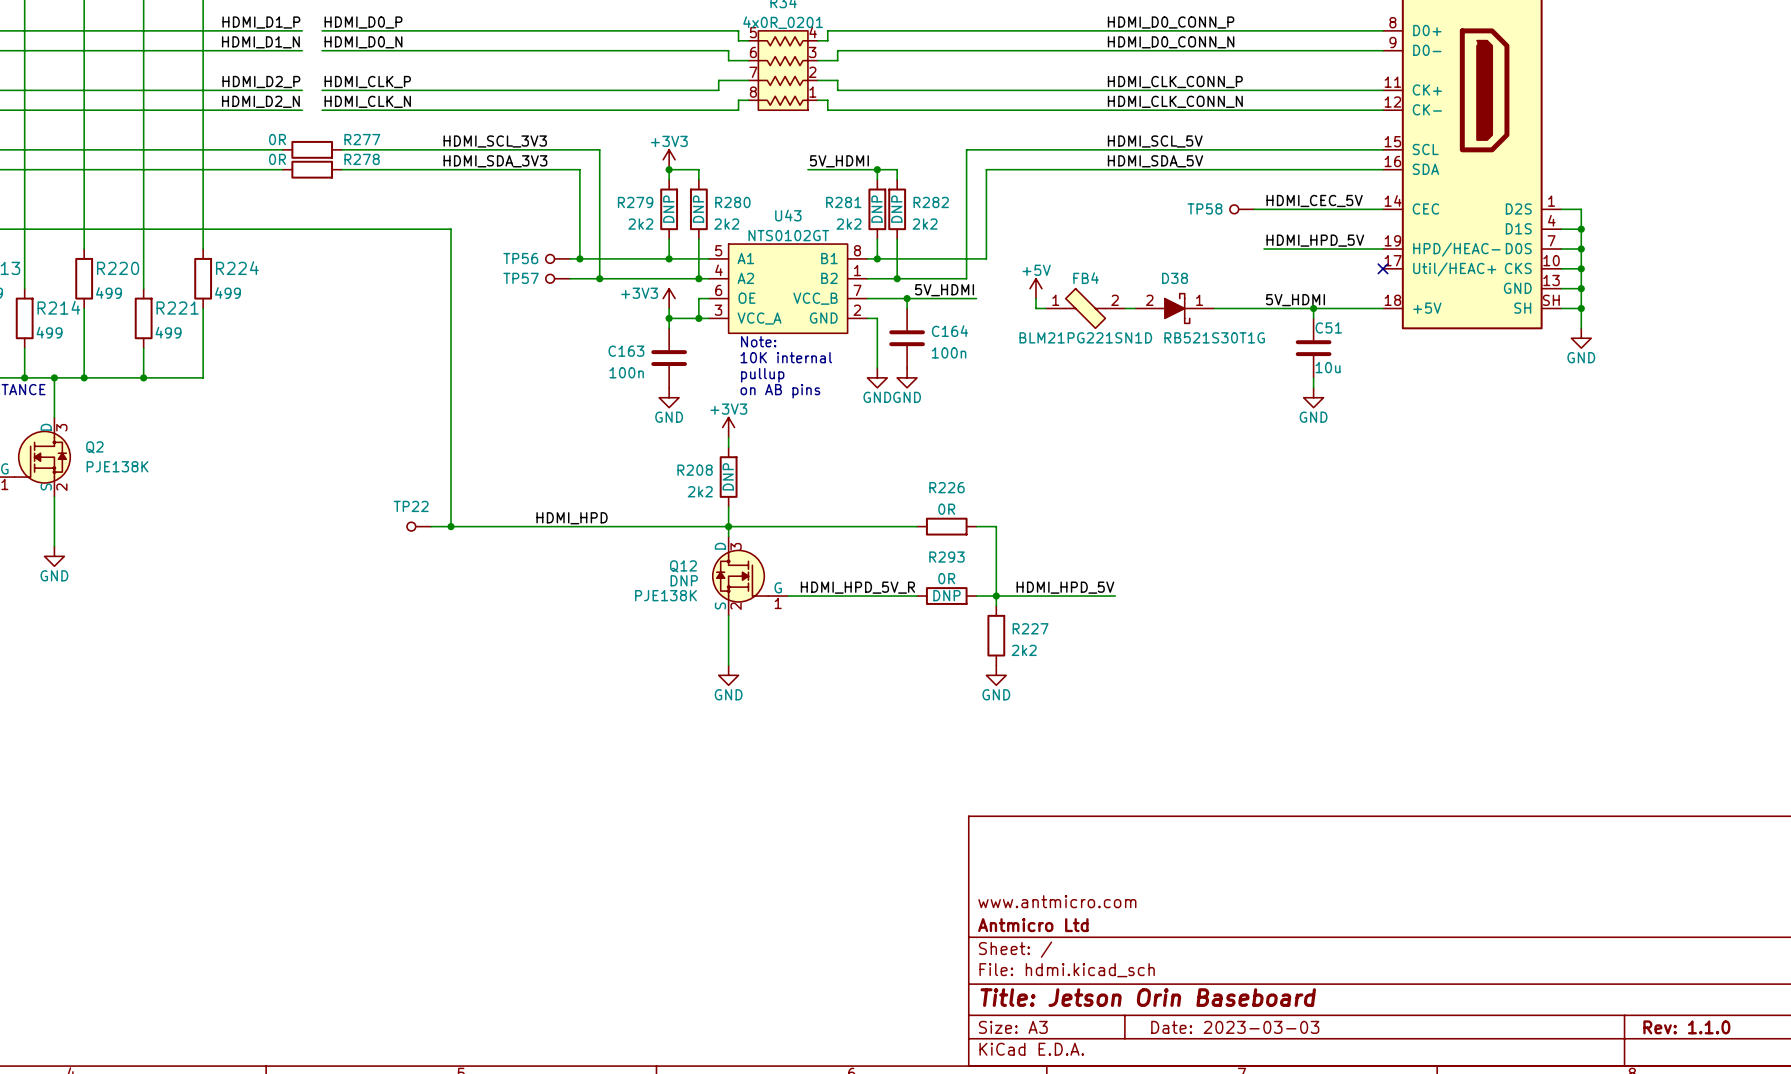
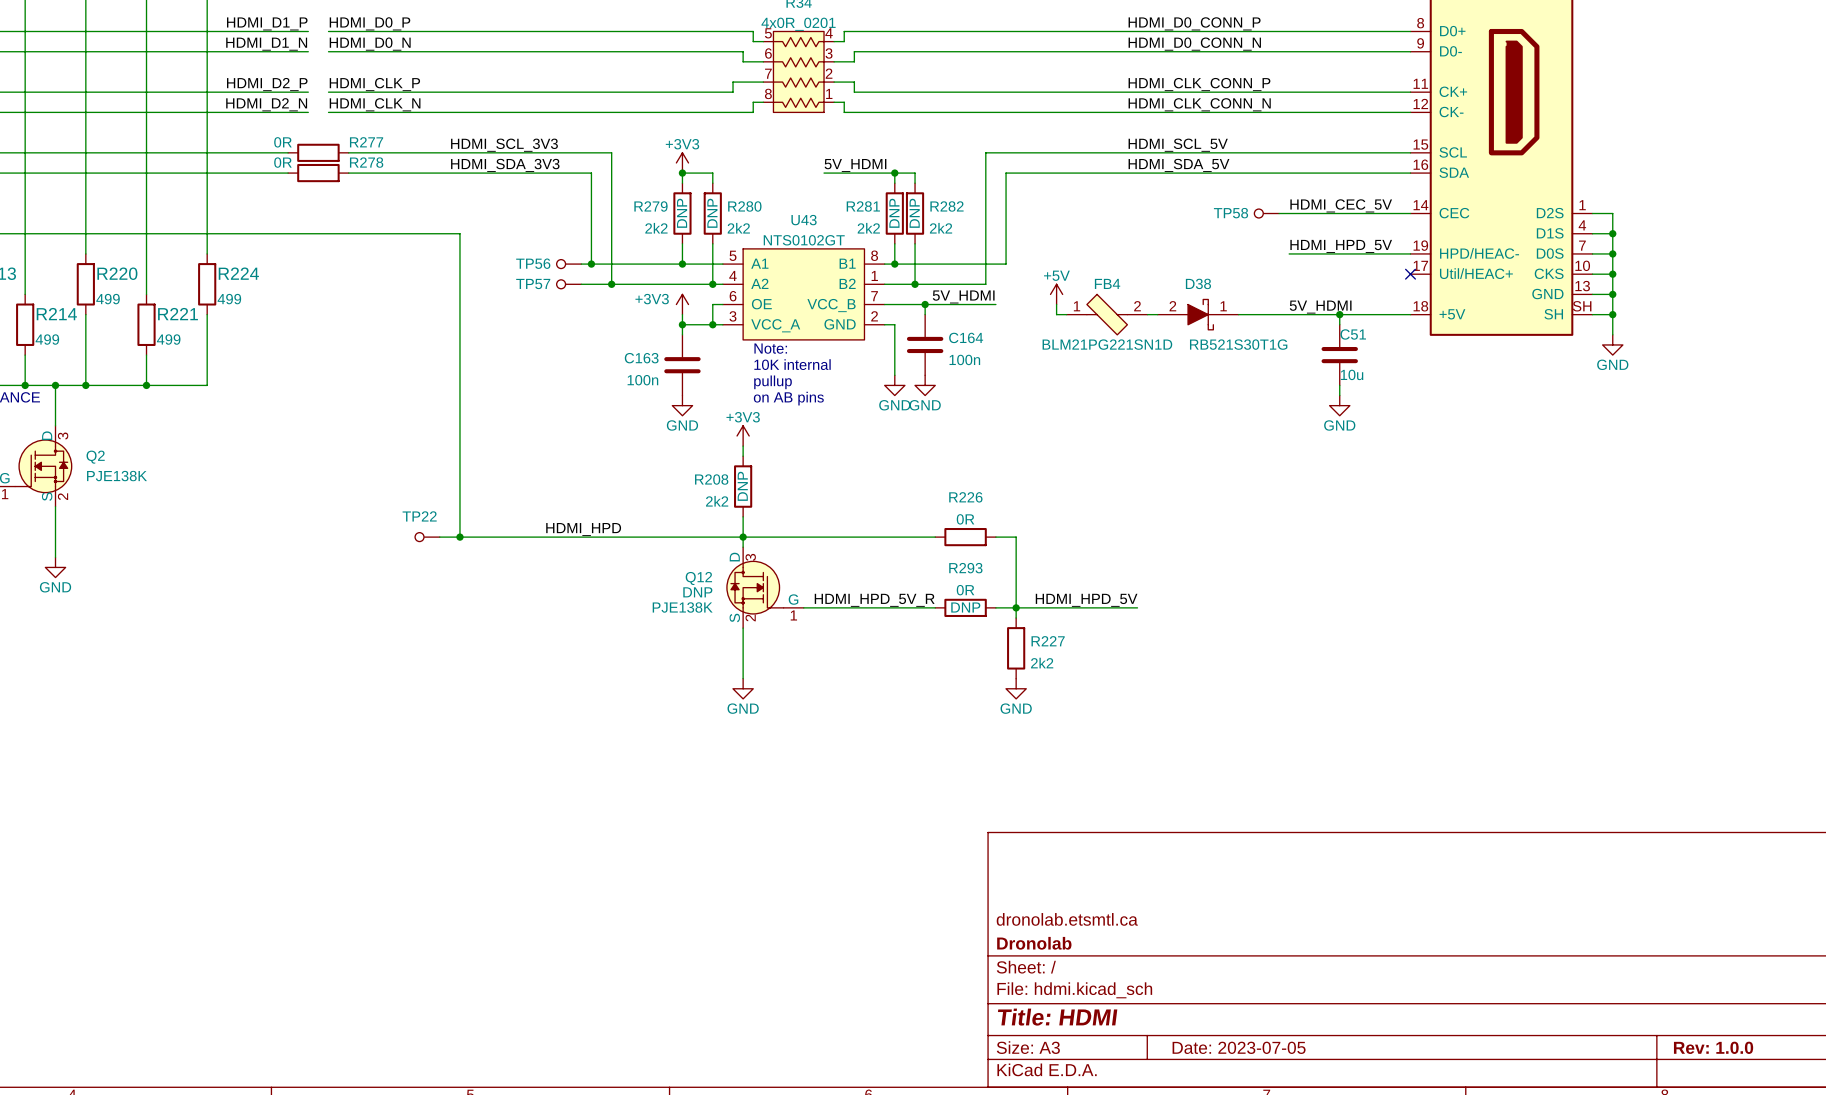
title block: www.antmicro.com (1057, 901) -> dronolab.etsmtl.ca (1067, 919)
title block: Antmicro Ltd (1033, 925) -> Dronolab (1034, 943)
title block: Title: Jetson Orin Baseboard (1148, 997) -> Title: HDMI (1057, 1017)
title block: Date: 2023-03-03 (1235, 1027) -> Date: 2023-07-05 (1239, 1047)
title block: Rev: 1.1.0 (1686, 1027) -> Rev: 1.0.0 (1713, 1047)

